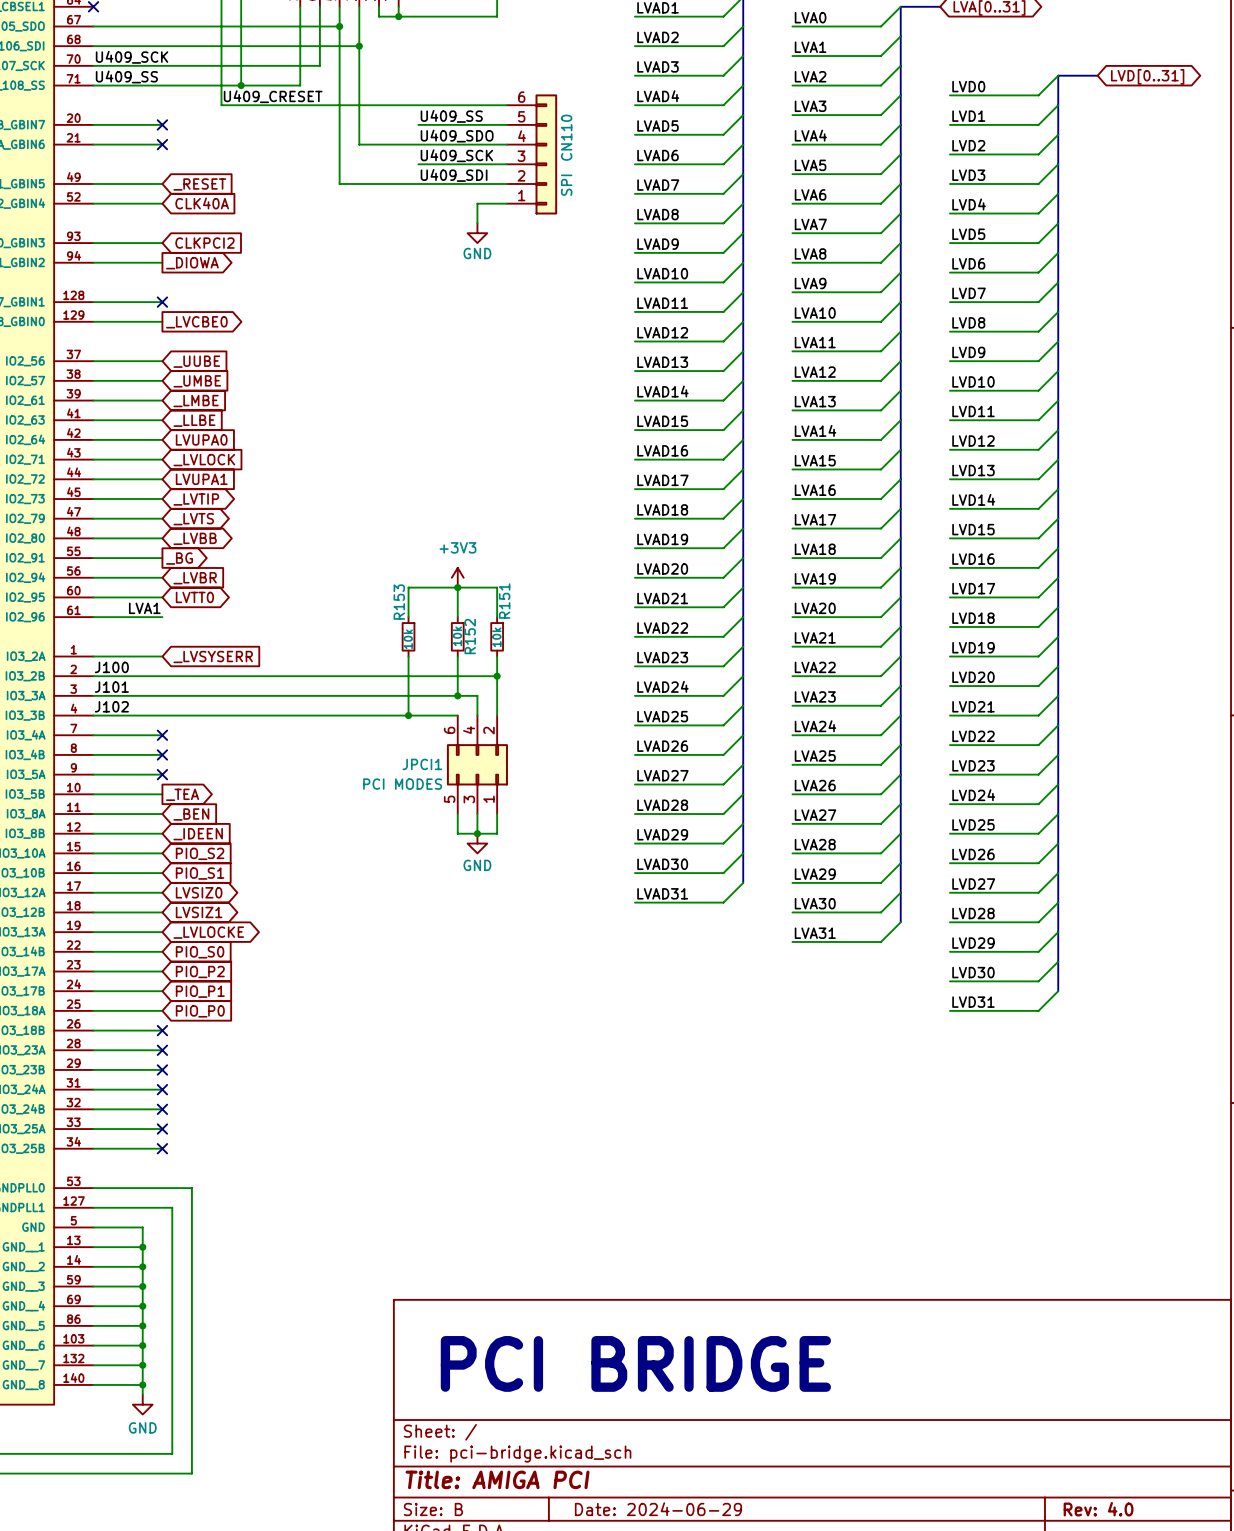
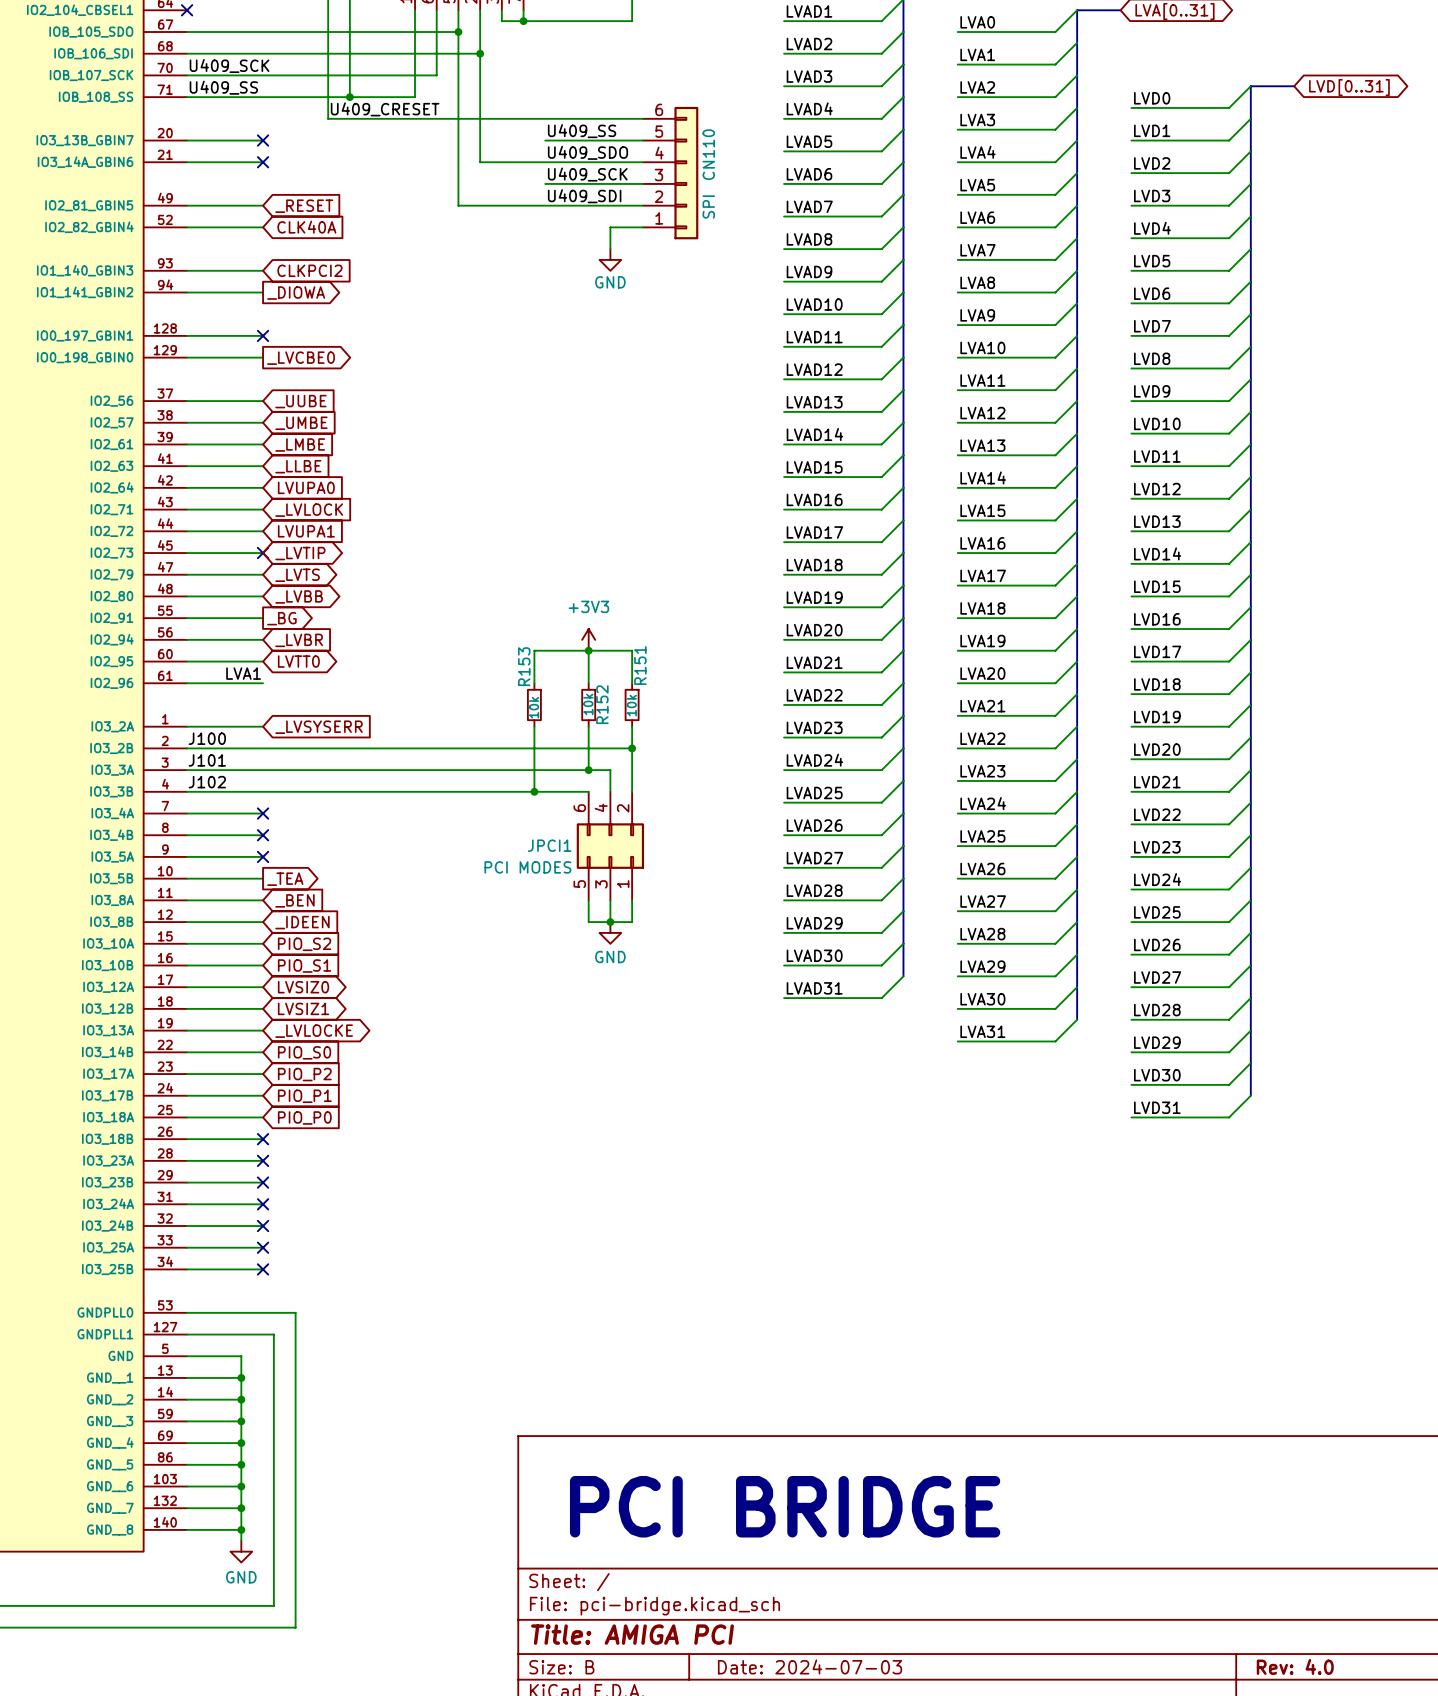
no-connect mark: none -> (263, 553)
title block: Date: 2024-06-29 (658, 1509) -> Date: 2024-07-03 (810, 1666)

